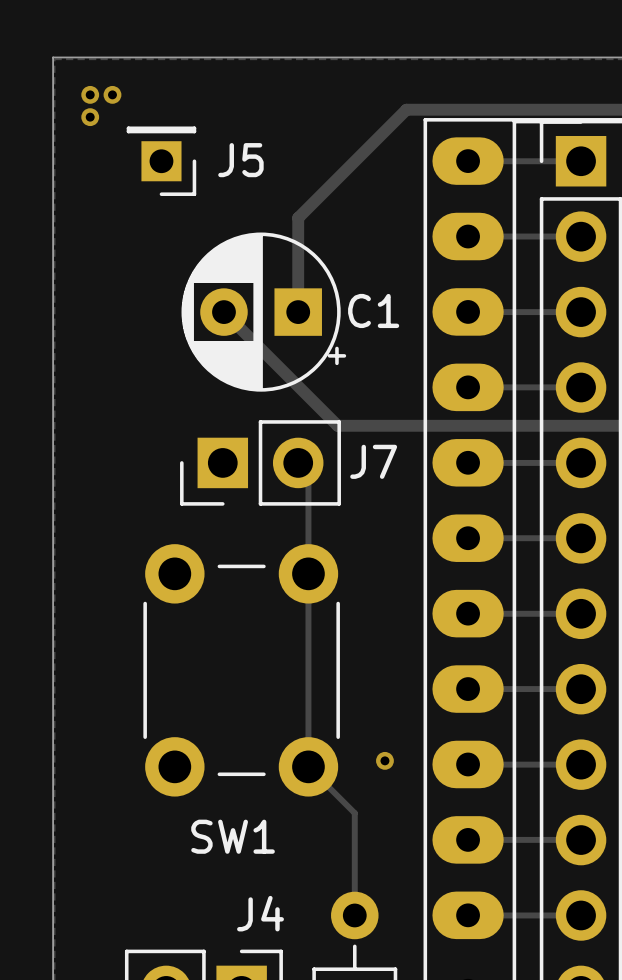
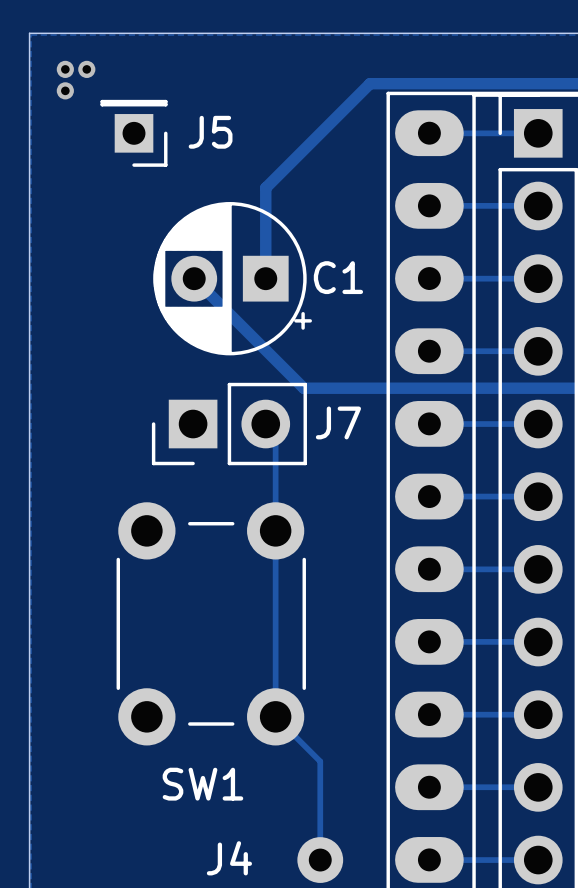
via: (384, 760) -> none

